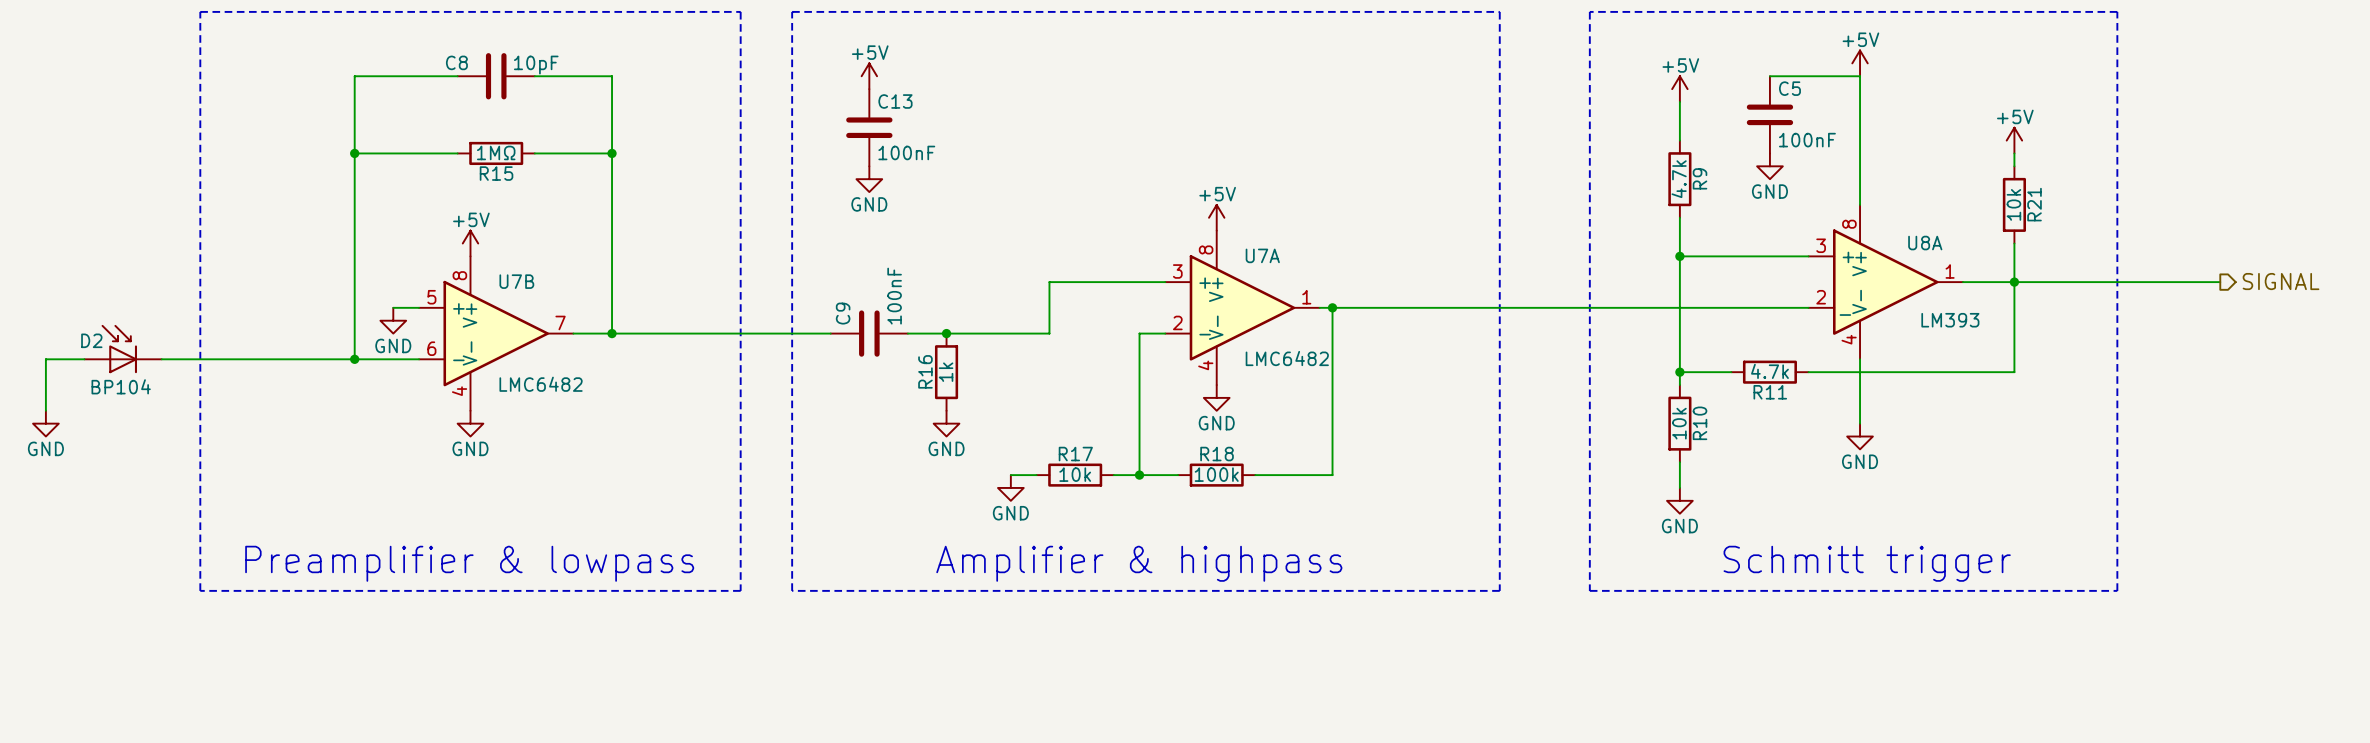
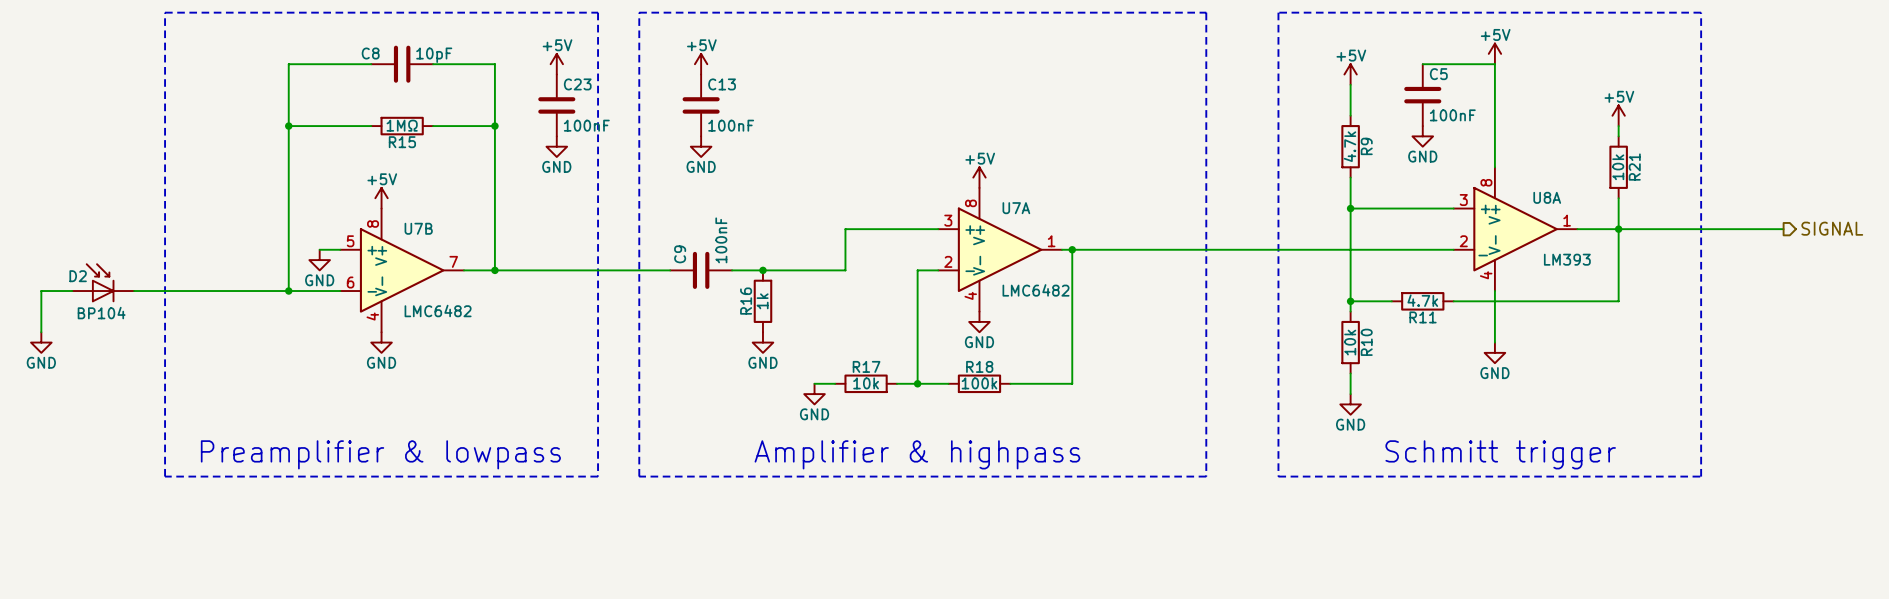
power symbol: none -> +5V (556, 64)
C23: none -> 100nF (556, 105)
power symbol: none -> GND (556, 146)

